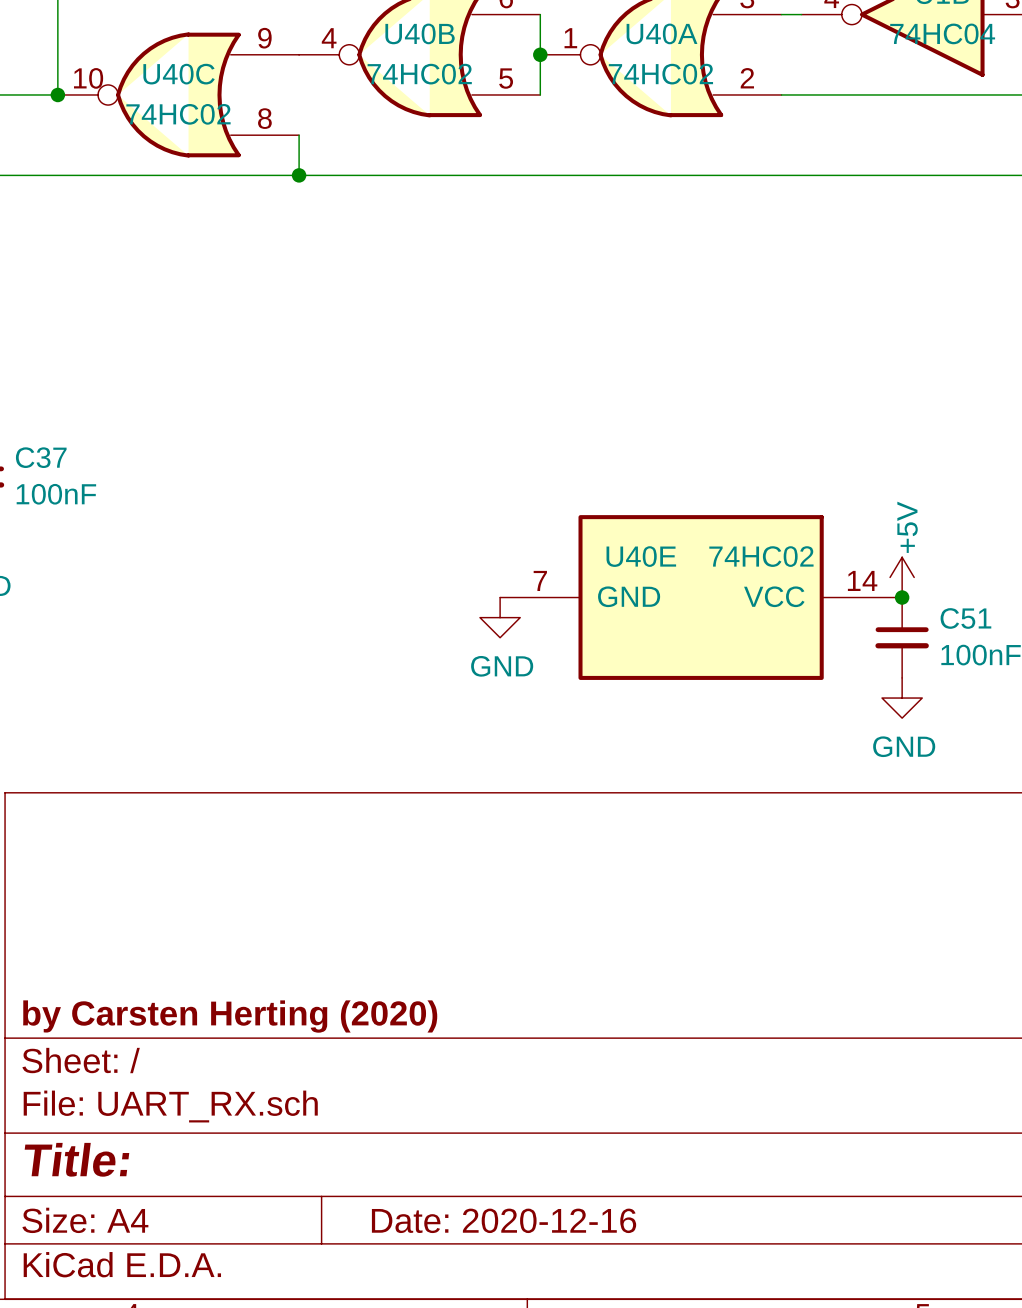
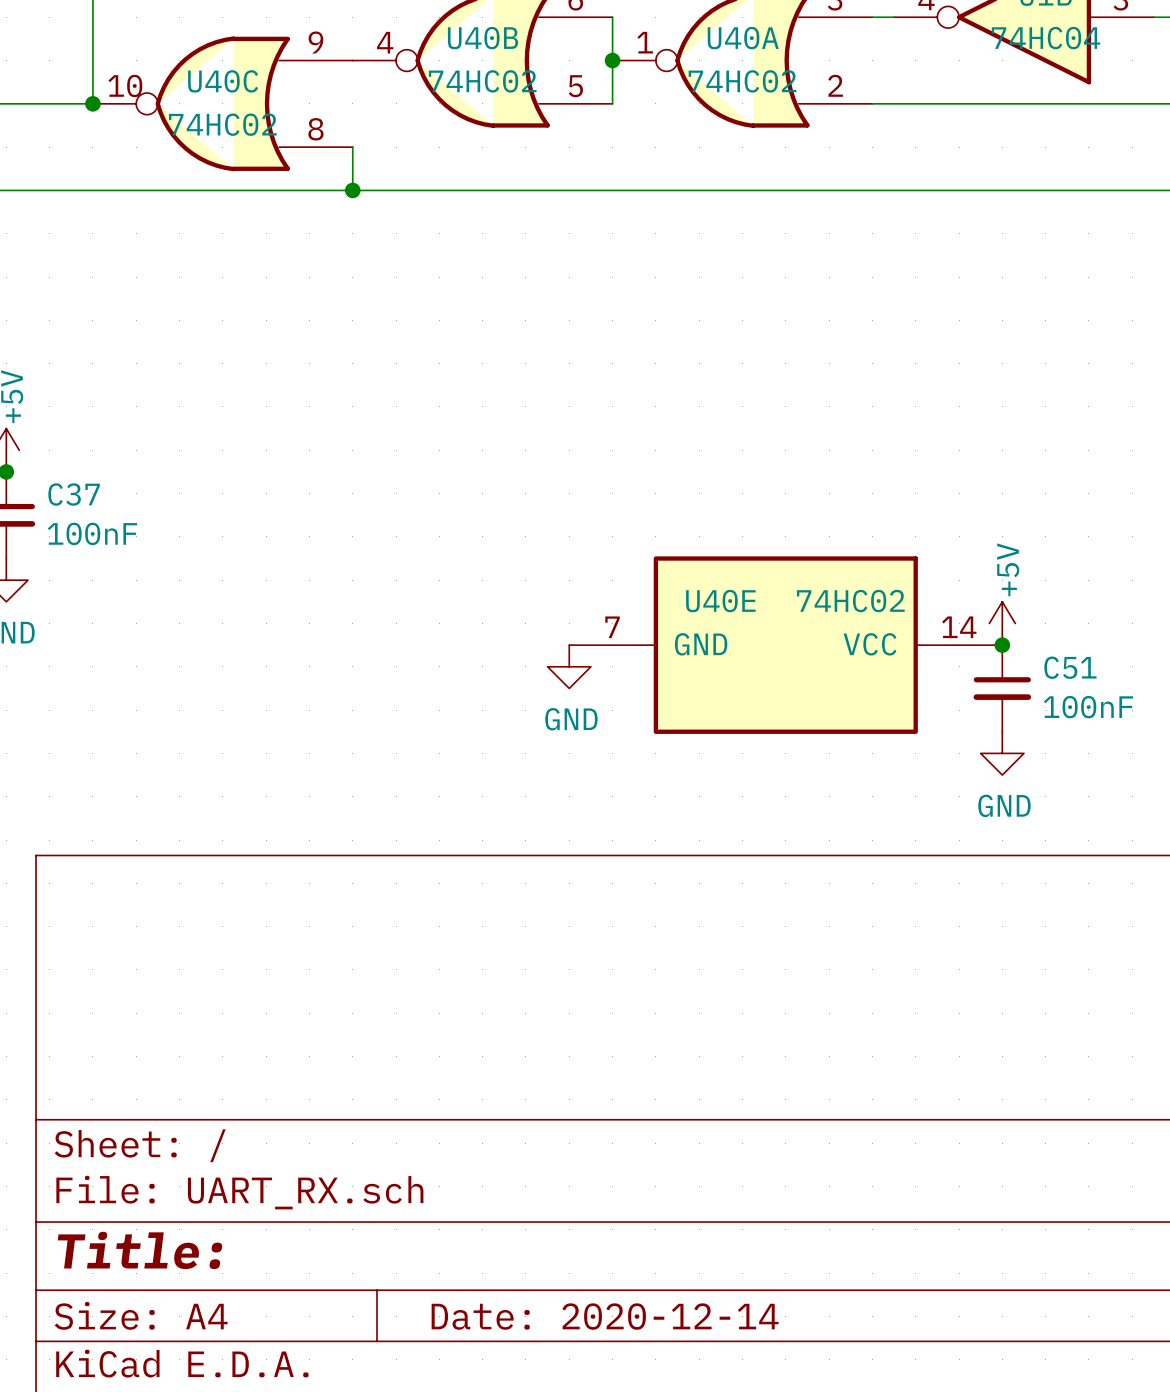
title block: by Carsten Herting (2020) (230, 1016) -> none
title block: Date: 2020-12-16 (504, 1220) -> Date: 2020-12-14 (605, 1316)

